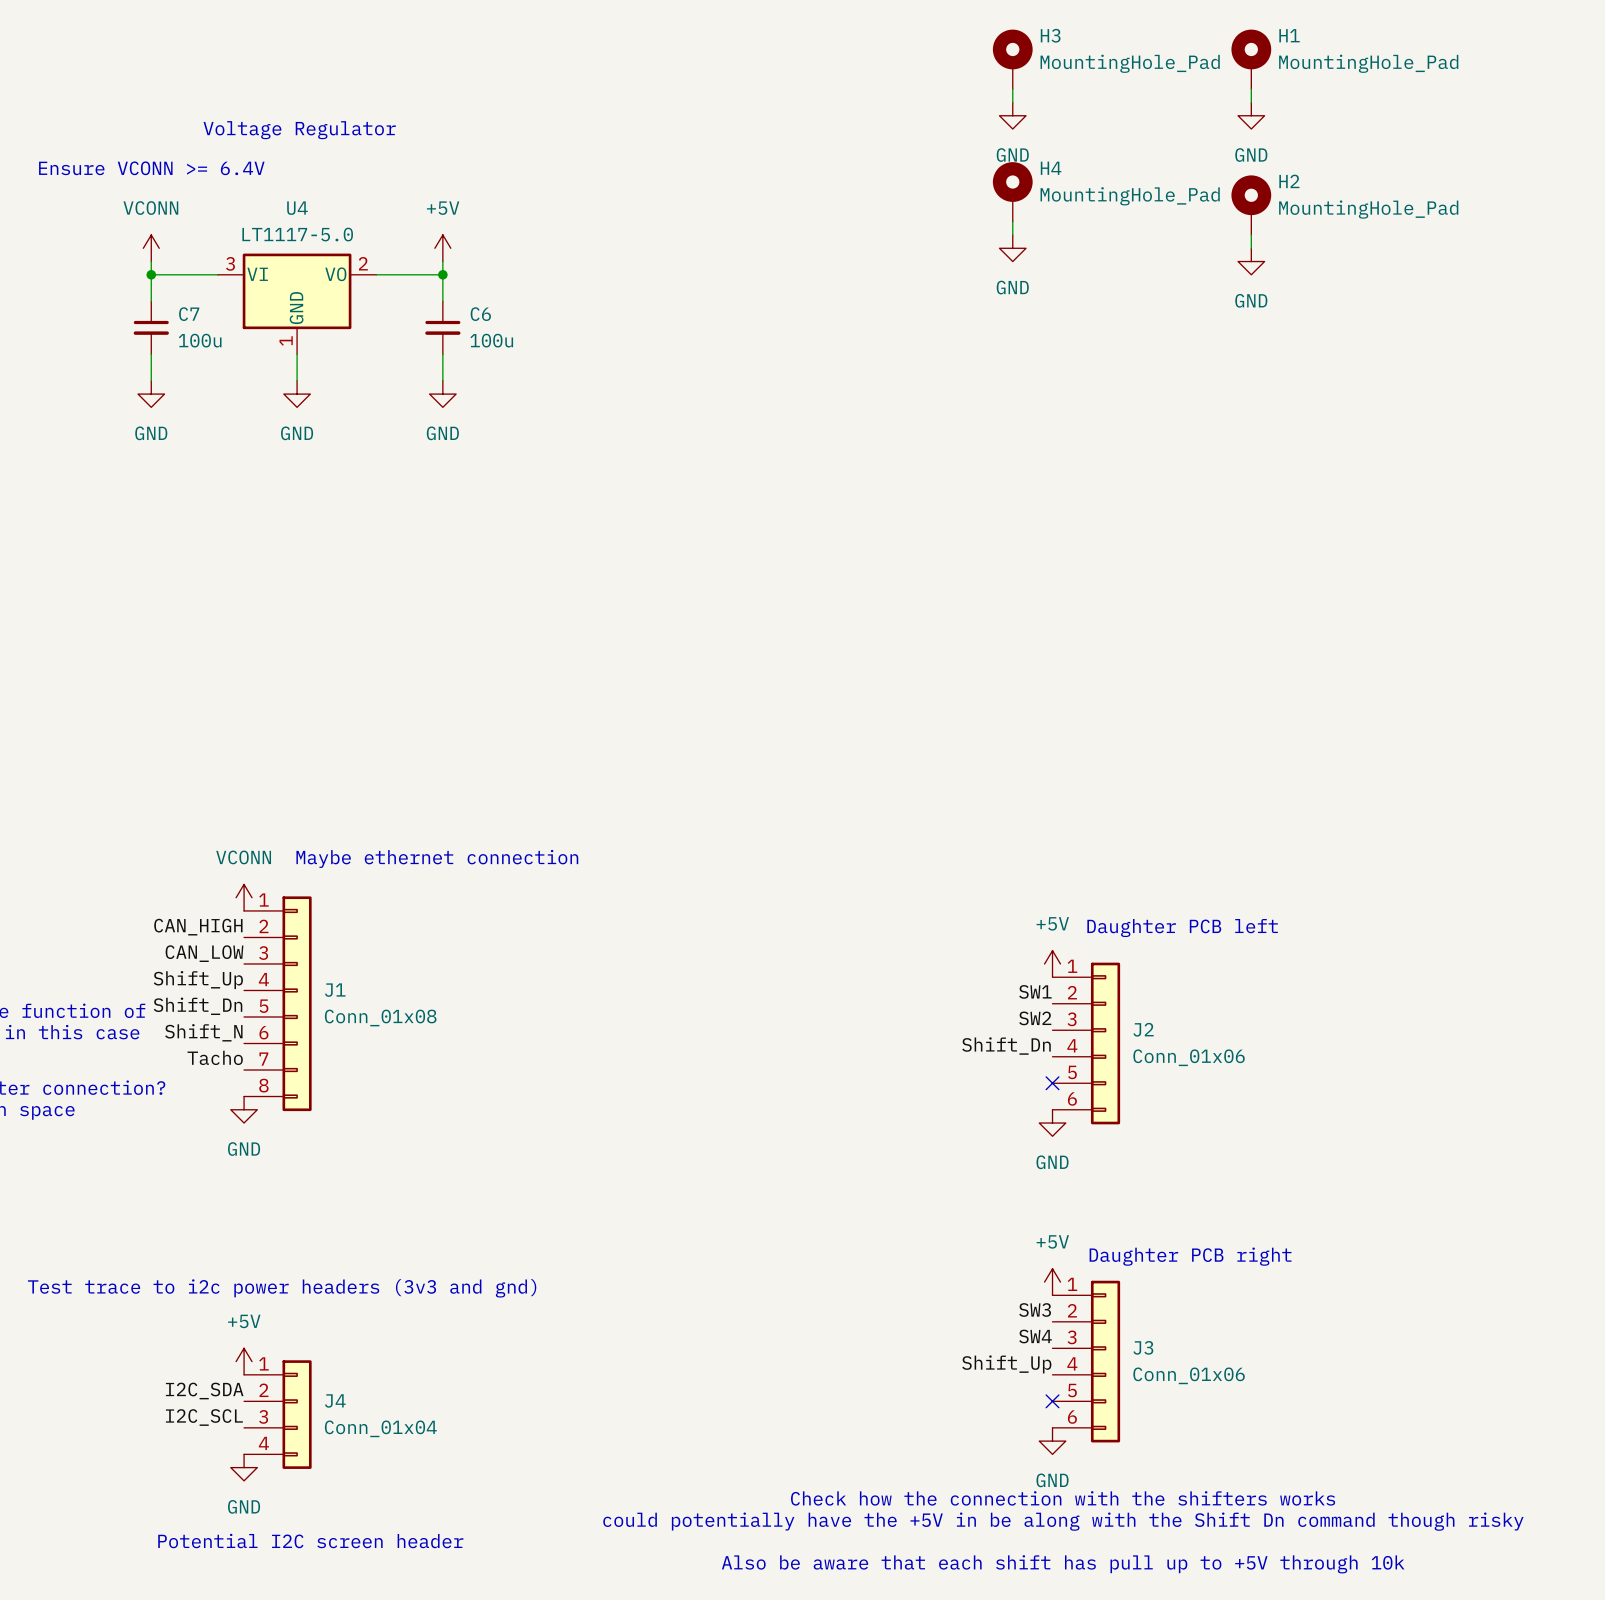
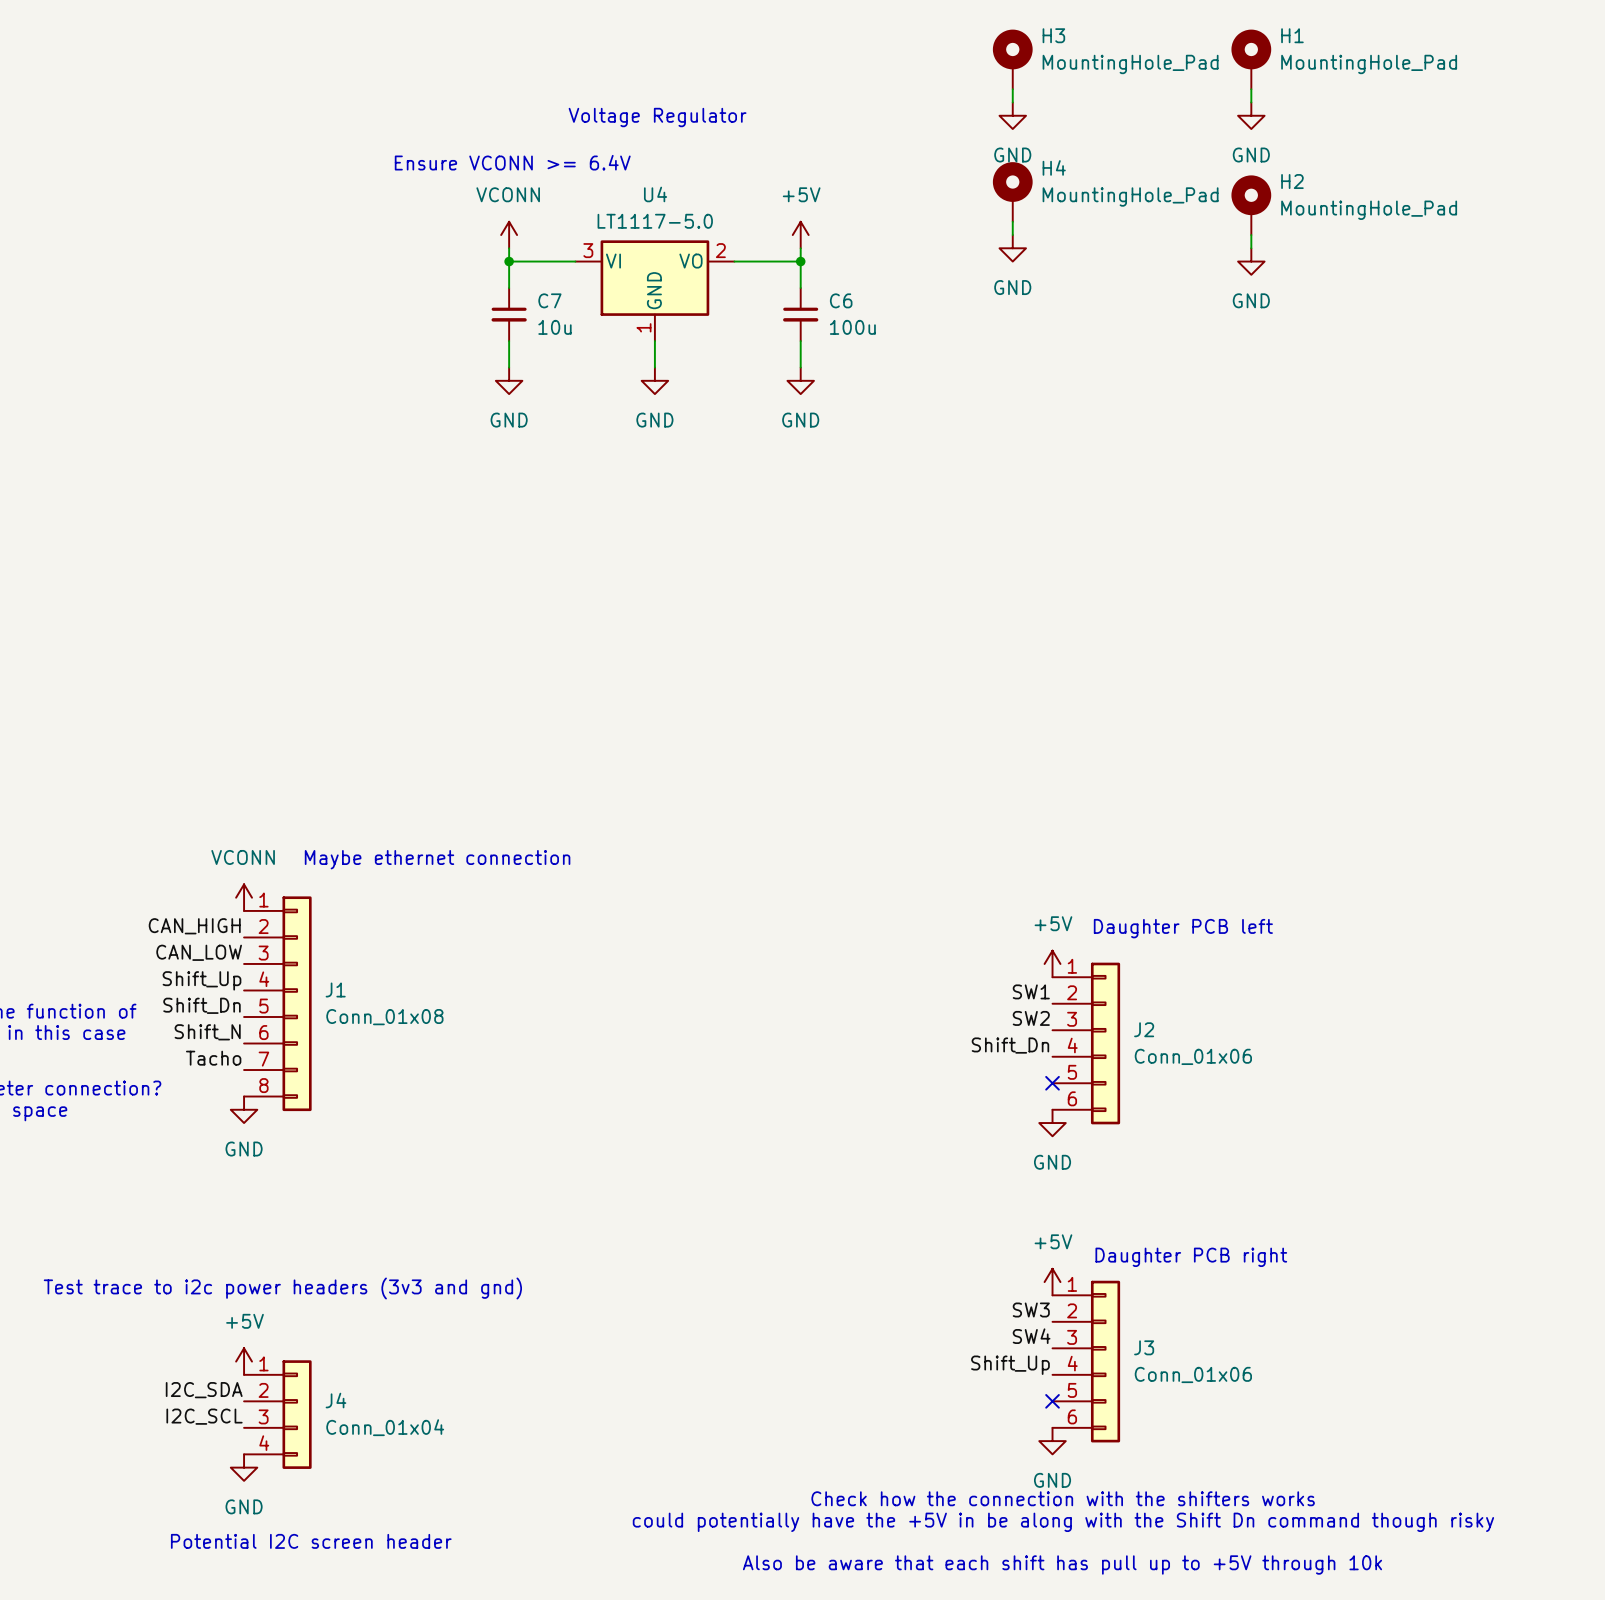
text: none -> Voltage Regulator (657, 117)
text: Voltage Regulator (299, 130) -> none
text: none -> Ensure VCONN >= 6.4V (512, 162)
text: Ensure VCONN >= 6.4V (151, 168) -> none
power symbol: none -> VCONN (509, 235)
power symbol: none -> +5V (800, 235)
power symbol: VCONN (151, 248) -> none
power symbol: +5V (442, 248) -> none
wire: none -> (800, 248) (800, 288)
wire: (151, 261) (151, 301) -> none
wire: (442, 261) (442, 301) -> (509, 248) (509, 288)
junction: none -> (509, 261)
wire: none -> (734, 261) (800, 261)
junction: none -> (800, 261)
wire: (151, 274) (217, 274) -> none
junction: (151, 274) -> none
wire: (376, 274) (442, 274) -> (509, 261) (575, 261)
junction: (442, 274) -> none
U4 position: (297, 303) -> (654, 290)
C7 position: (151, 327) -> (509, 314)
C6 position: (442, 327) -> (800, 314)
C7 value: 100u (200, 340) -> 10u (554, 327)
wire: none -> (654, 341) (654, 367)
wire: none -> (800, 341) (800, 367)
wire: (151, 354) (151, 380) -> none
wire: (297, 354) (297, 380) -> none
wire: (442, 354) (442, 380) -> (509, 341) (509, 367)
power symbol: none -> GND (654, 380)
power symbol: none -> GND (800, 380)
power symbol: GND (151, 394) -> none
power symbol: GND (297, 394) -> none
power symbol position: GND (442, 394) -> GND (509, 380)

